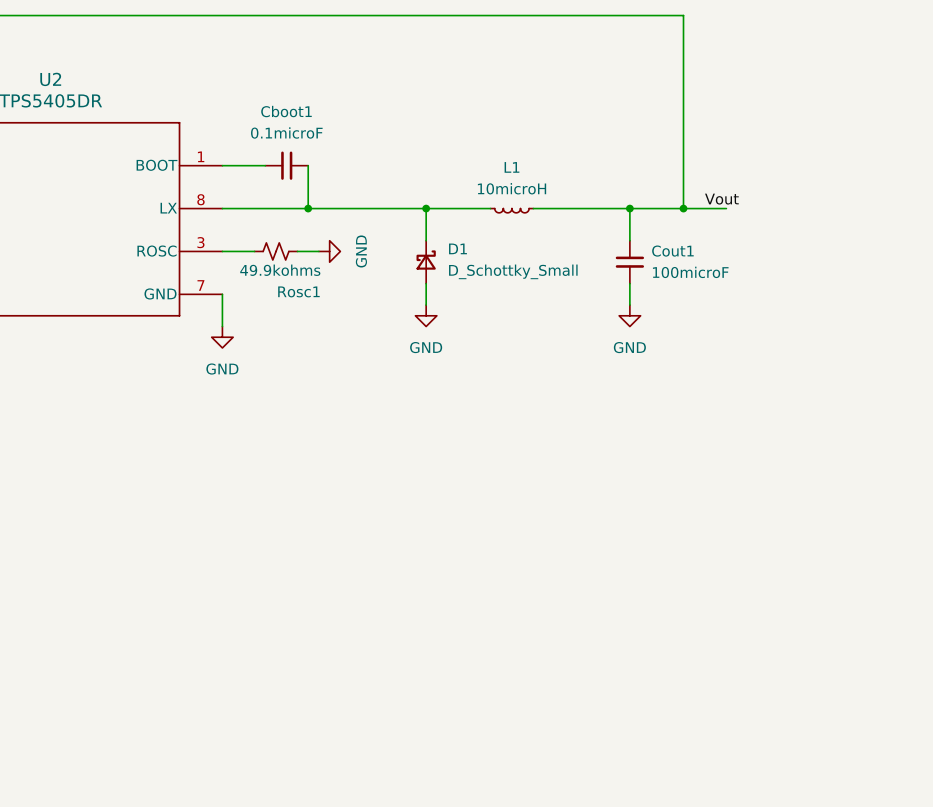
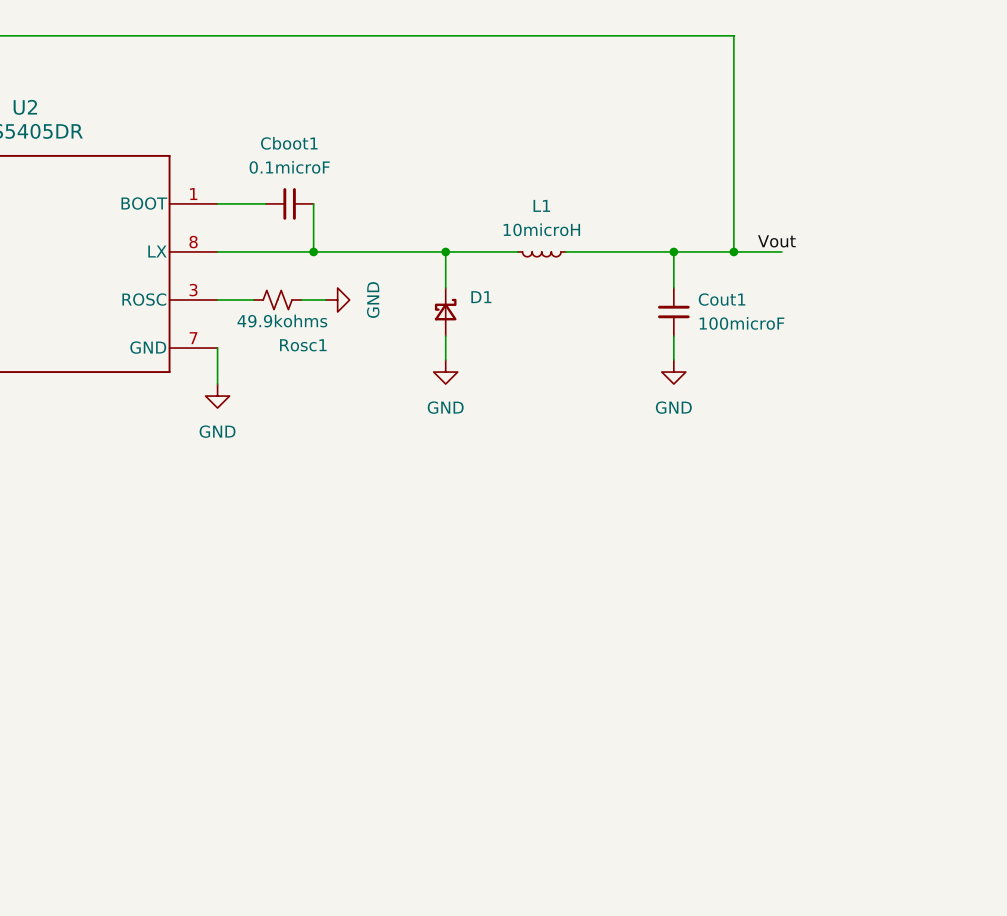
D1 value: D_Schottky_Small (513, 271) -> none

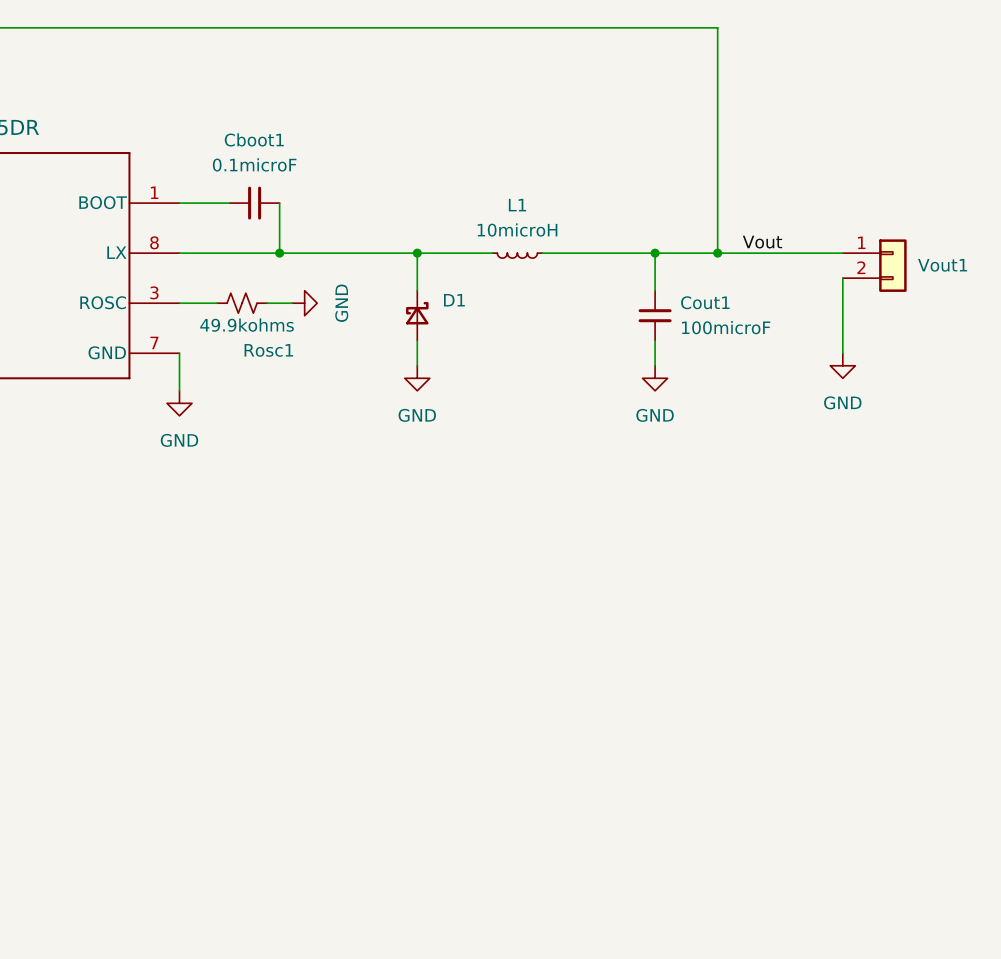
wire: none -> (767, 253) (842, 253)
Vout1: none -> (874, 265)
wire: none -> (842, 278) (842, 353)
power symbol: none -> GND (842, 365)

